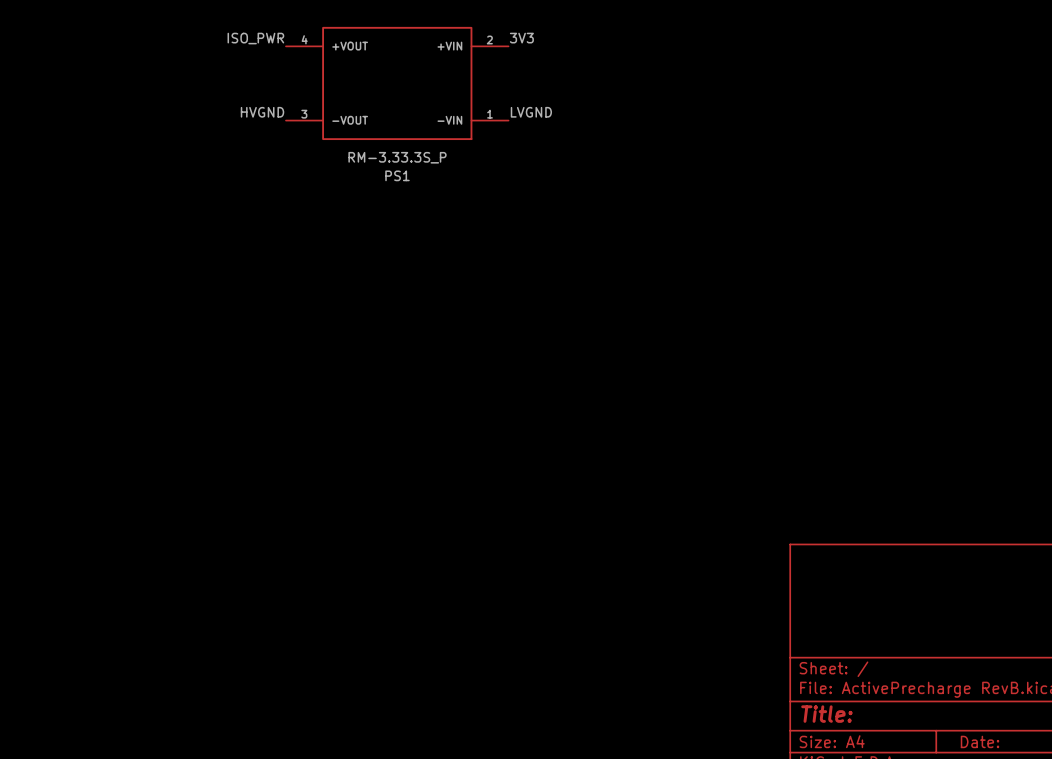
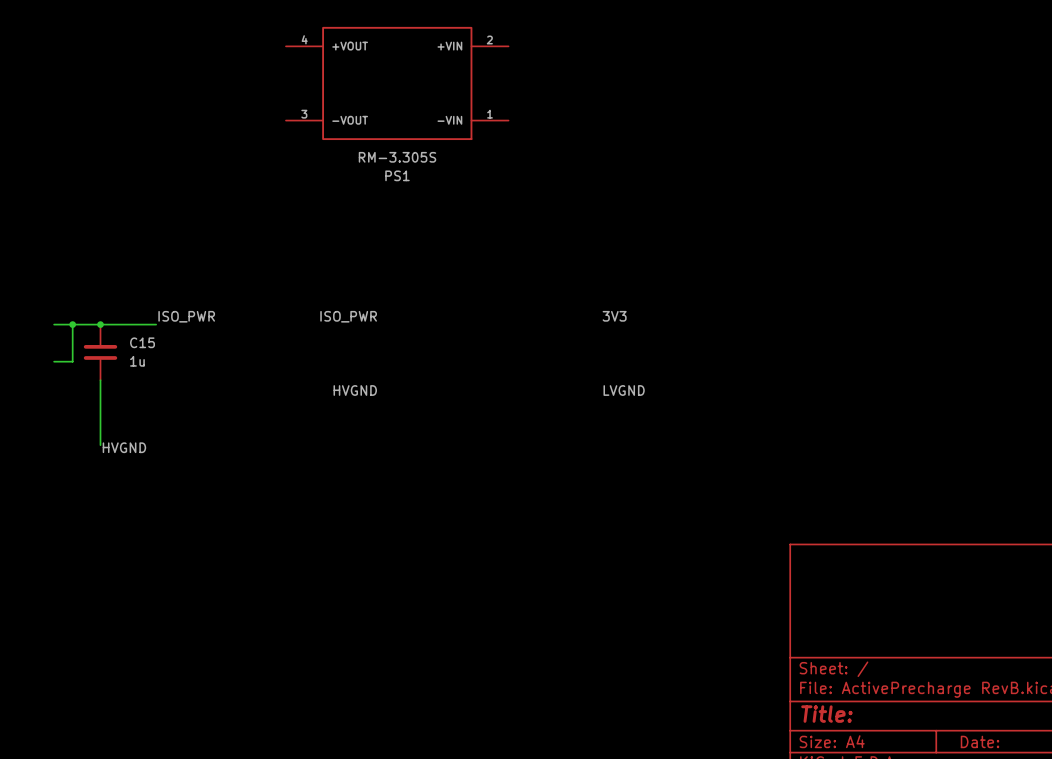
label: ISO_PWR (255, 38) -> none
label: 3V3 (521, 38) -> none
label: HVGND (262, 112) -> none
label: LVGND (531, 112) -> none
PS1 value: RM-3.33.3S_P (397, 157) -> RM-3.305S (397, 157)
label: none -> ISO_PWR (186, 316)
label: none -> ISO_PWR (348, 316)
label: none -> 3V3 (614, 316)
wire: none -> (54, 324) (156, 324)
wire: none -> (72, 324) (72, 361) (54, 361)
junction: none -> (72, 324)
junction: none -> (100, 324)
C15: none -> 1u (100, 352)
wire: none -> (100, 380) (100, 445)
label: none -> HVGND (355, 390)
label: none -> LVGND (624, 390)
label: none -> HVGND (124, 447)

